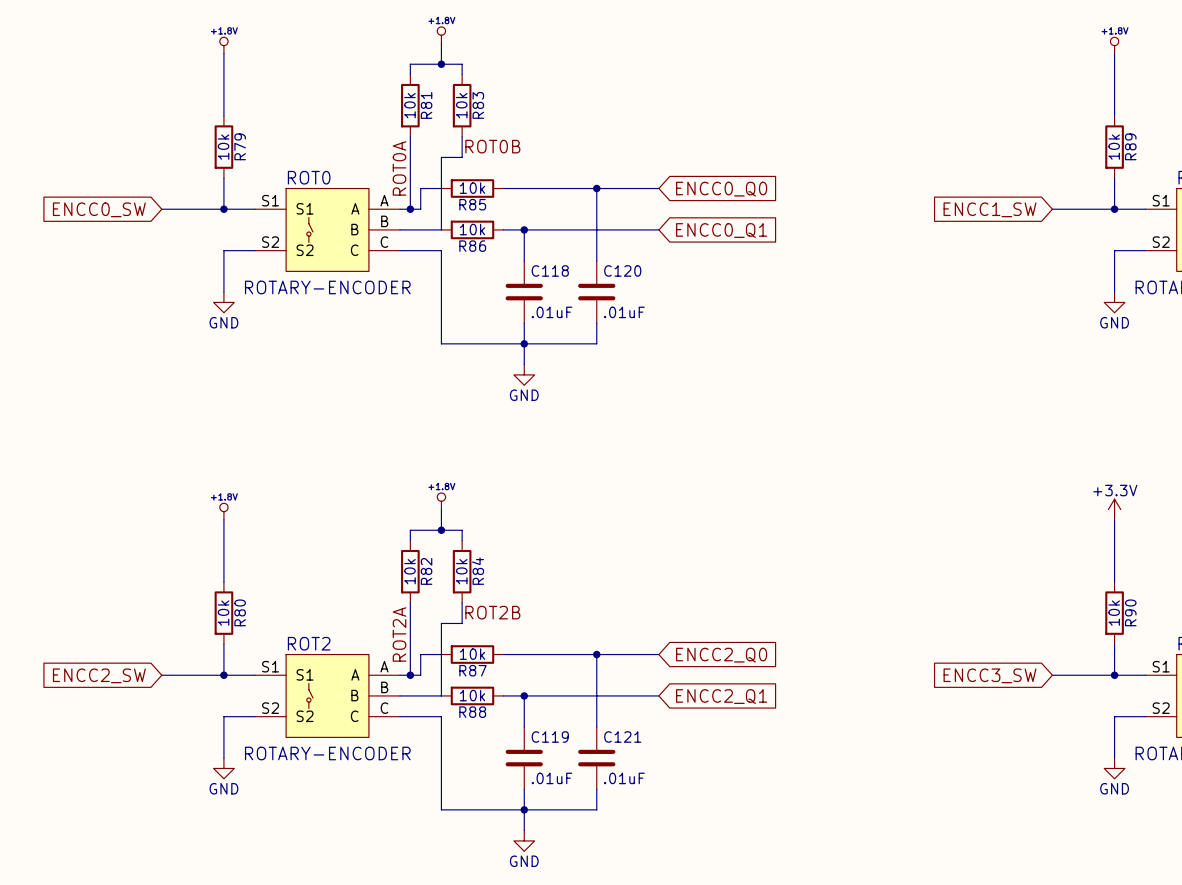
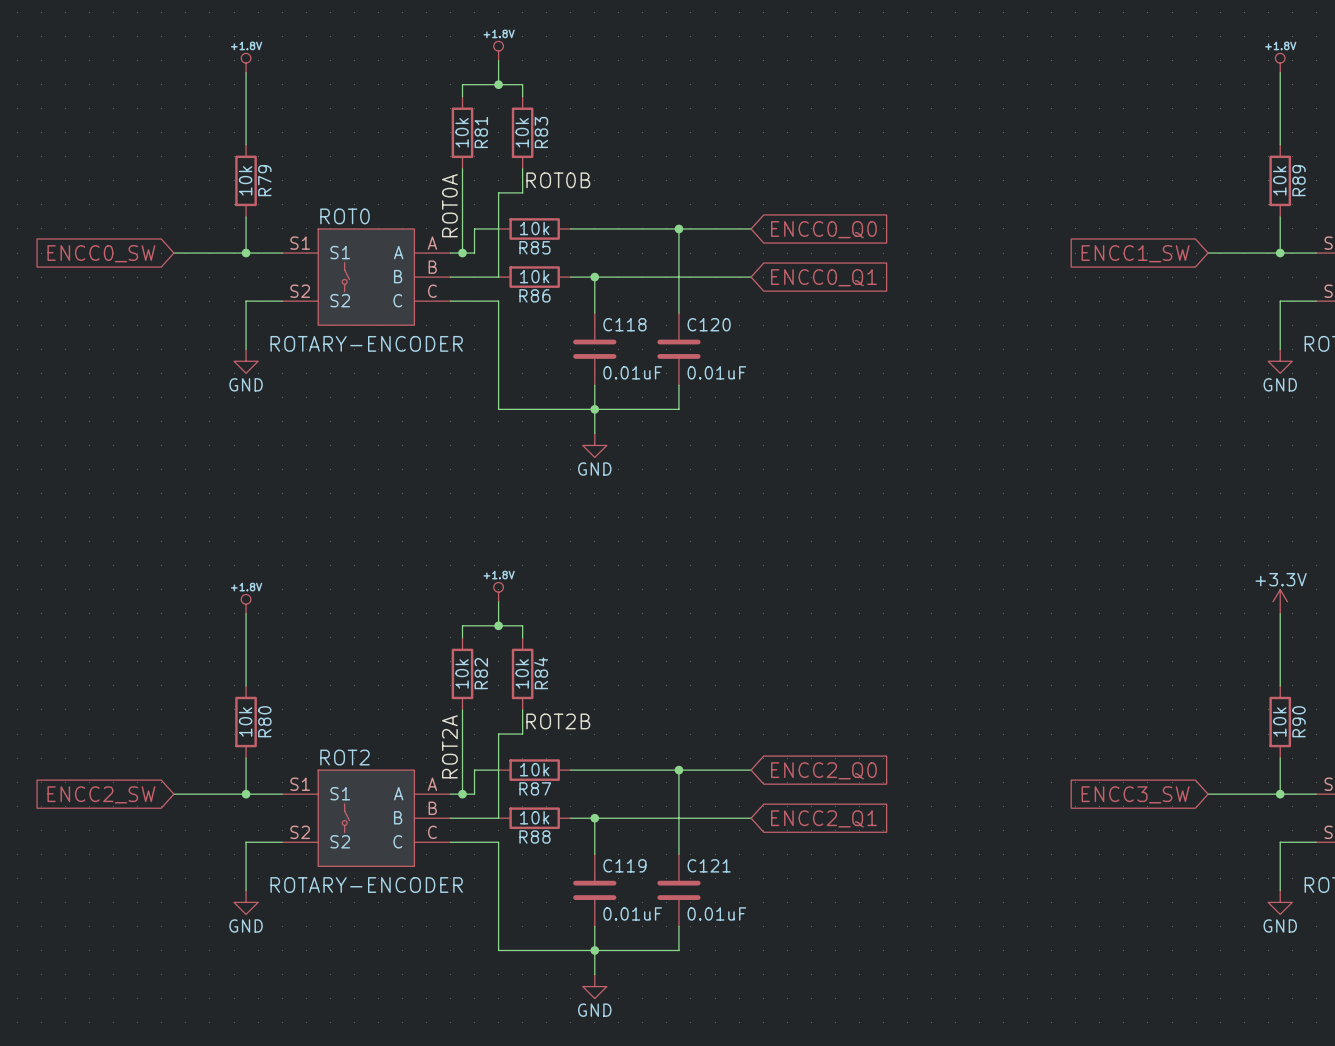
C118 value: .01uF (551, 312) -> 0.01uF (632, 372)
C120 value: .01uF (624, 312) -> 0.01uF (716, 372)
C119 value: .01uF (551, 778) -> 0.01uF (632, 913)
C121 value: .01uF (624, 778) -> 0.01uF (716, 913)

